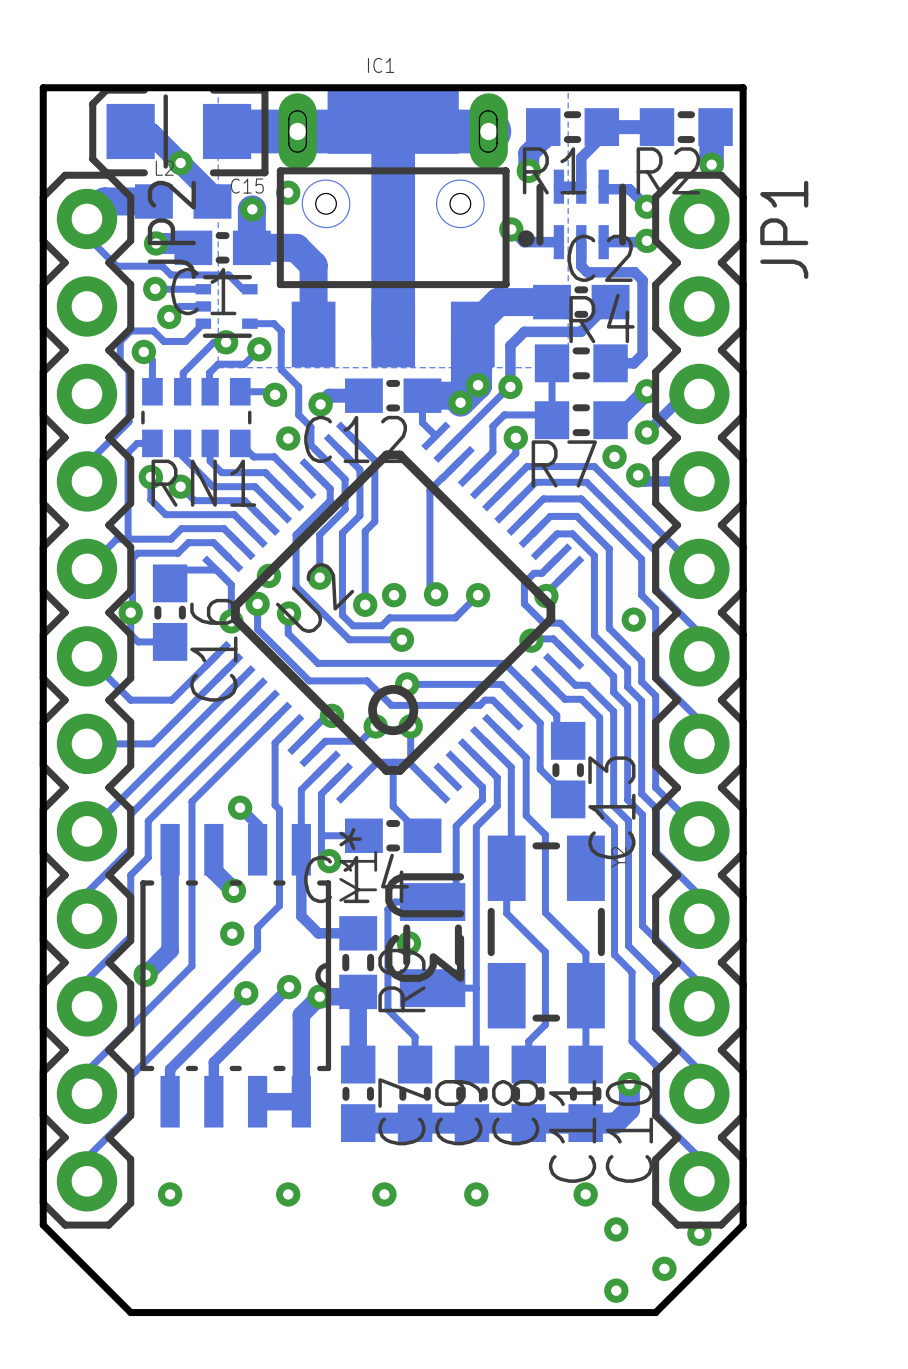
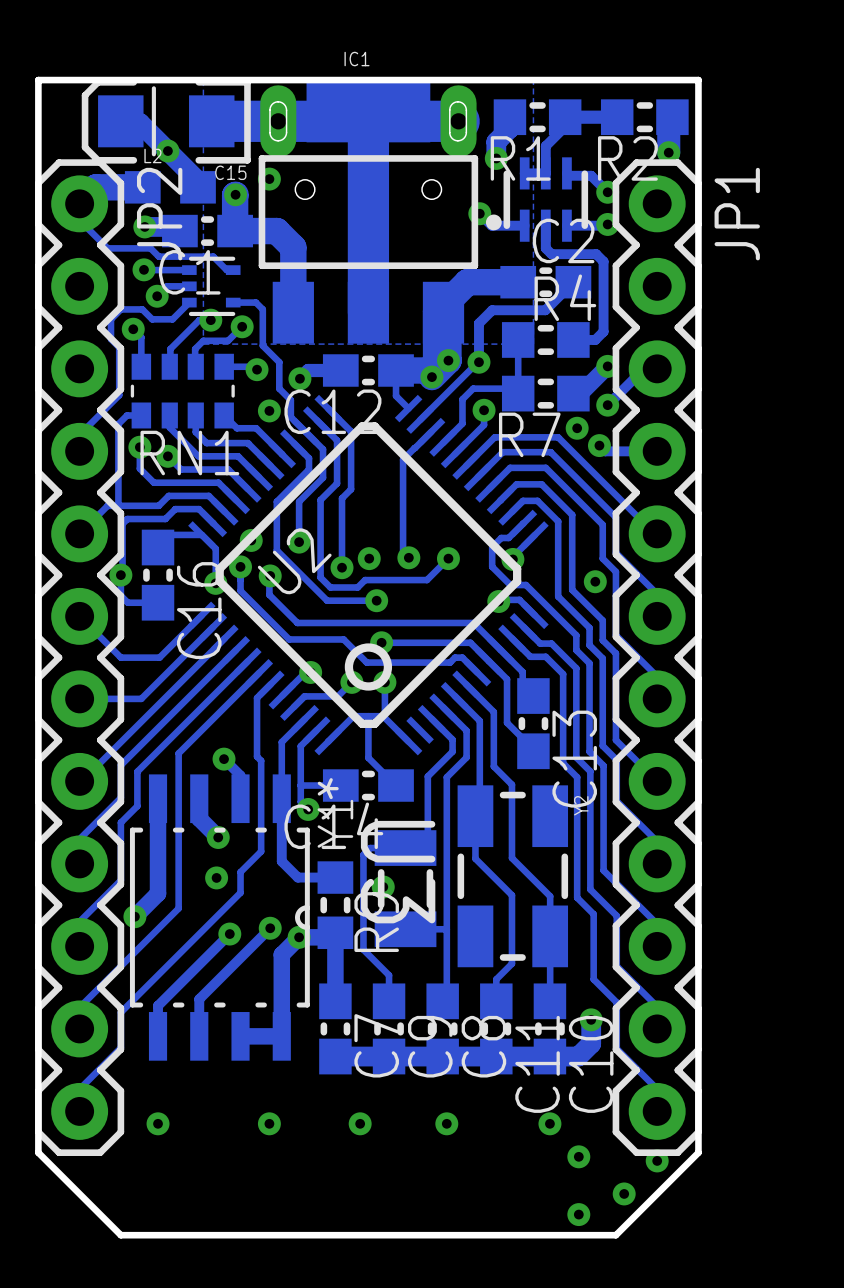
zone outline: (326, 180) (335, 181) (342, 187) (347, 194) (349, 203) (348, 211) (342, 220) (336, 225) (326, 227) (316, 225) (309, 220) (304, 212) (302, 203) (303, 195) (309, 187) (317, 181) (325, 180) -> none
zone outline: (460, 180) (469, 181) (477, 187) (482, 194) (484, 203) (481, 214) (477, 220) (470, 225) (460, 227) (451, 225) (443, 220) (438, 212) (436, 203) (437, 195) (443, 187) (452, 181) (460, 180) -> none

